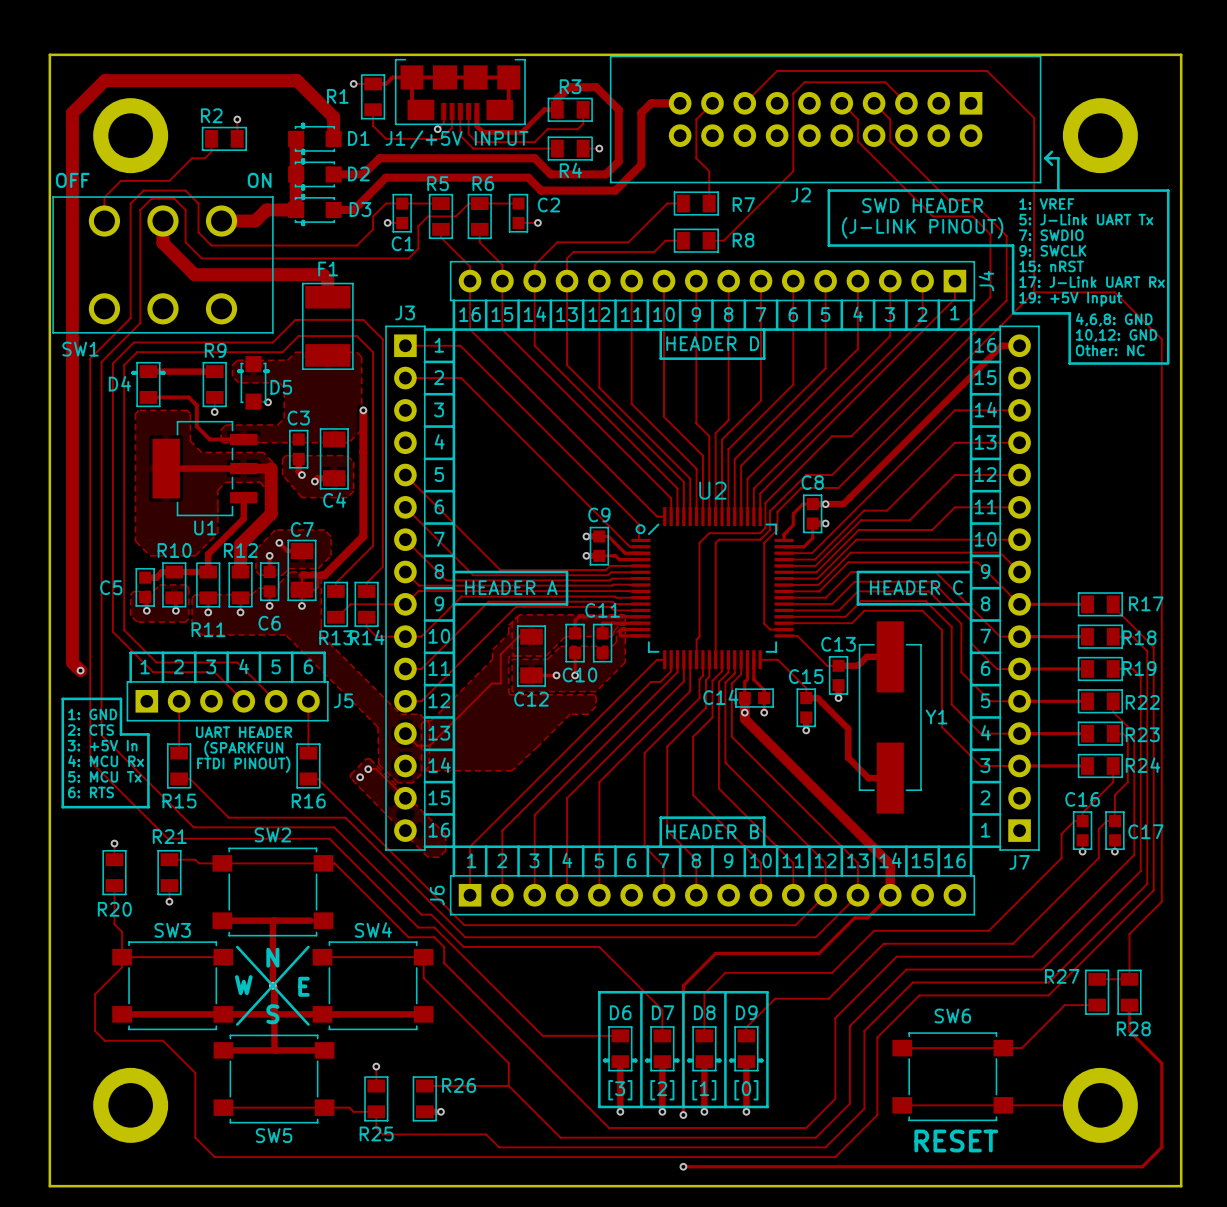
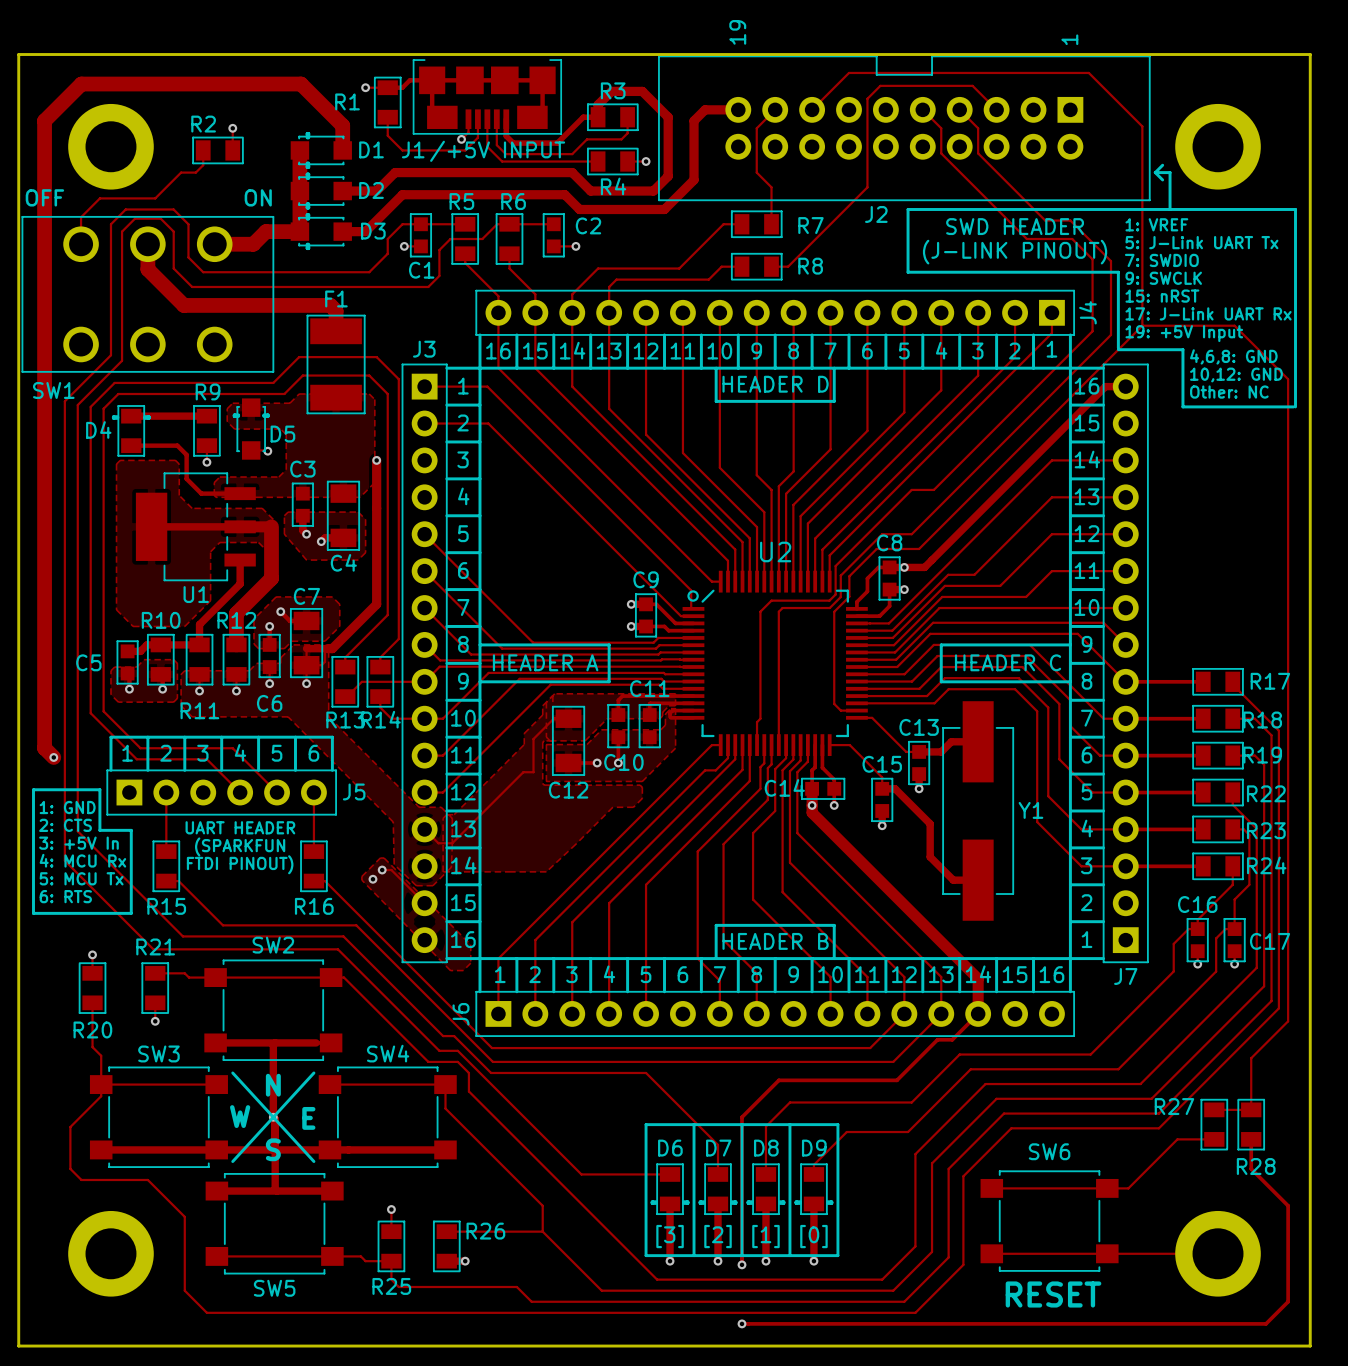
J2 footprint: [609, 55, 1042, 184] -> [658, 55, 1151, 202]

